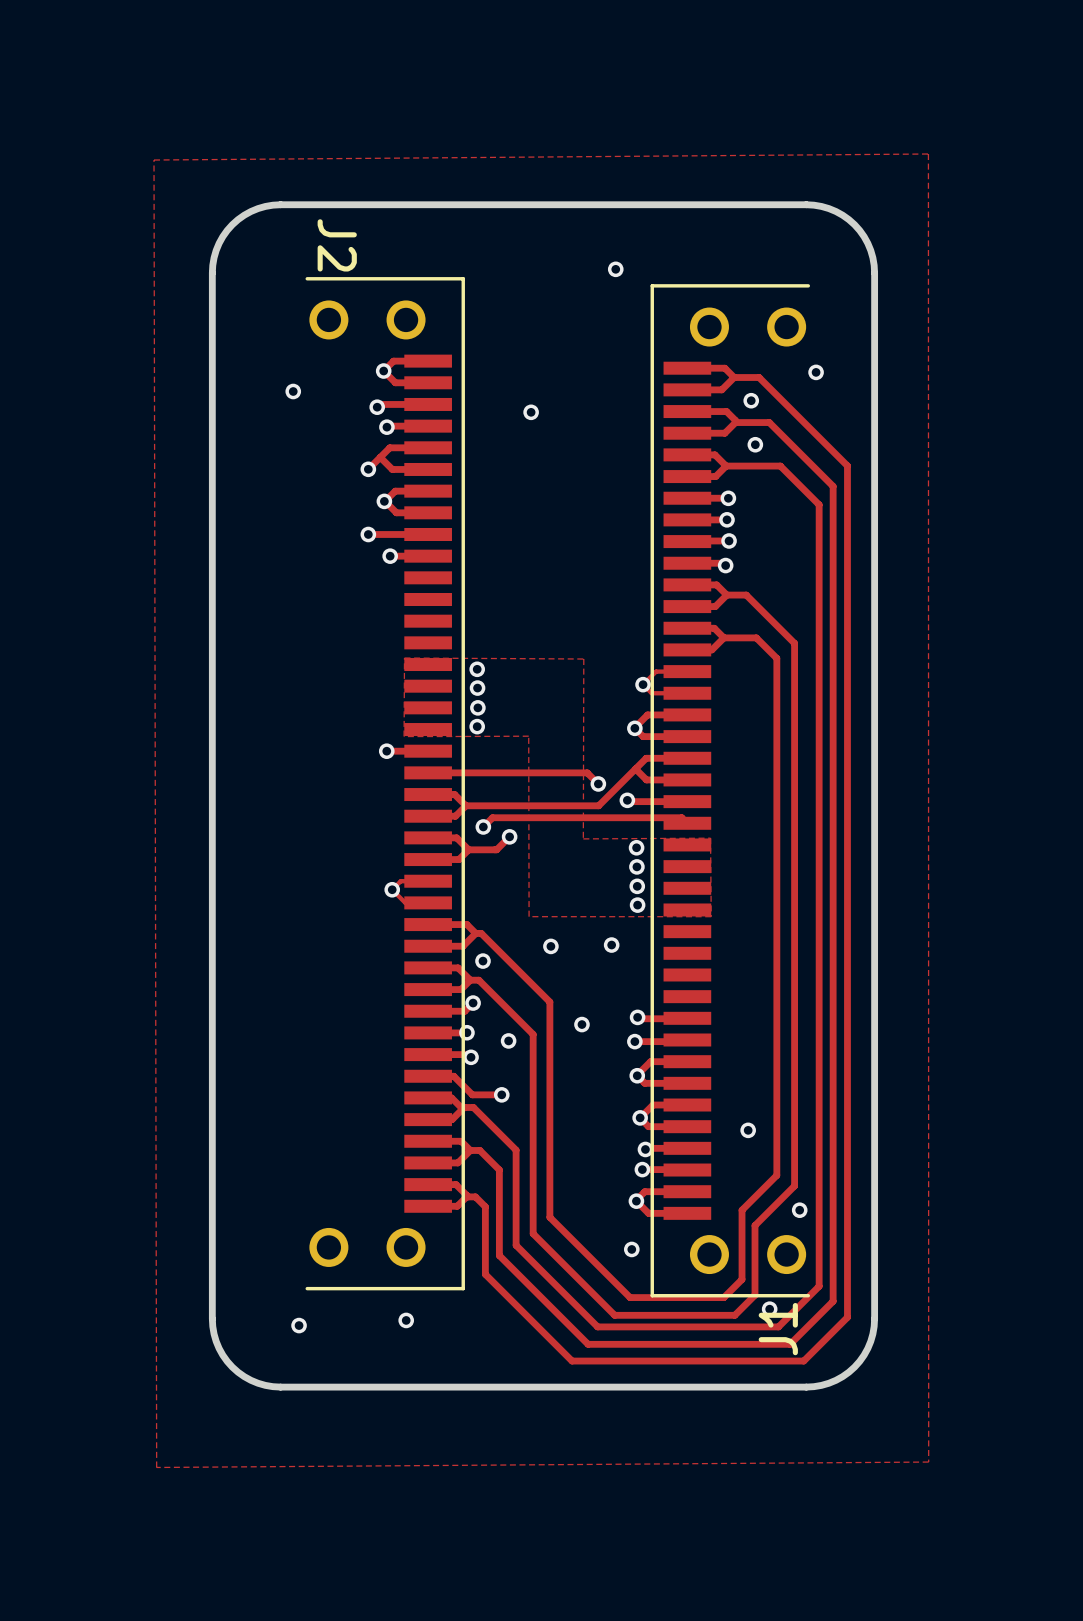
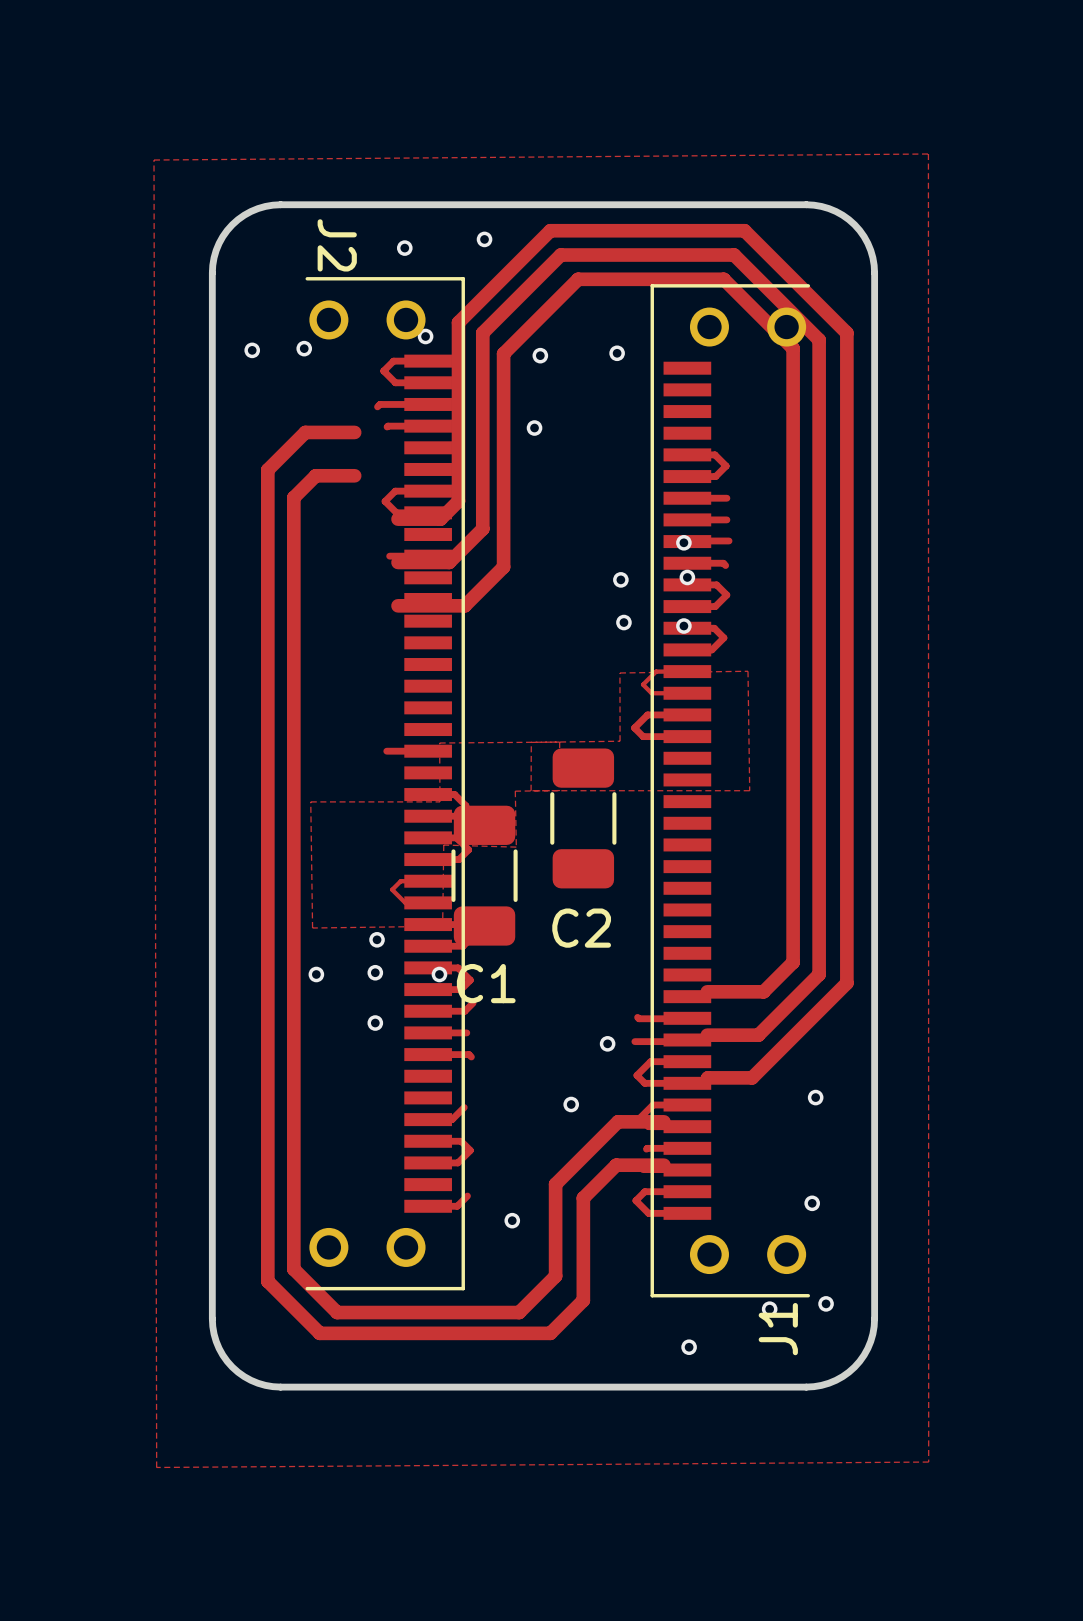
via: none -> (484, 239)
via: none -> (404, 248)
via: (615, 269) -> none
via: none -> (425, 336)
via: none -> (304, 348)
via: none -> (252, 350)
via: none -> (617, 353)
via: none -> (540, 355)
track: (687, 368) (724, 368) (734, 377) -> none
via: (383, 371) -> none
via: (816, 372) -> none
track: (734, 377) (721, 389) (687, 389) -> none
track: (734, 377) (759, 377) (847, 465) (847, 1317) (803, 1361) (572, 1361) (485, 1274) (485, 1206) (475, 1196) (468, 1196) (456, 1184) (428, 1184) -> none
via: (293, 391) -> none
via: (751, 400) -> none
via: (377, 407) -> none
track: (687, 411) (726, 411) (735, 422) -> none
via position: (531, 412) -> (534, 428)
track: (735, 422) (769, 422) (833, 486) (833, 1301) (790, 1344) (588, 1344) (499, 1255) (499, 1169) (479, 1150) (470, 1150) -> none
track: (735, 422) (724, 433) (687, 433) -> none
via: (386, 427) -> none
track: none -> (354, 432) (305, 432) (267, 469) (267, 1281) (319, 1333) (550, 1333) (583, 1300) (583, 1198) (616, 1165) (663, 1165)
via: (755, 444) -> none
track: (428, 447) (389, 447) (368, 469) -> none
track: (380, 457) (392, 469) (428, 469) -> none
track: (726, 466) (780, 466) (819, 504) -> (398, 562) (449, 562) (482, 528) (482, 333) (560, 255) (734, 255) (819, 339) (819, 504)
via: (368, 469) -> none
track: none -> (354, 475) (315, 475) (293, 497) (293, 1269) (337, 1312) (519, 1312) (555, 1276) (555, 1184) (618, 1121) (663, 1121)
via: (728, 498) -> none
via: (384, 501) -> none
track width: thin (819, 504) (819, 1286) -> thick (819, 504) (819, 1286)
track: none -> (398, 519) (440, 519) (458, 501) (458, 322) (550, 230) (744, 230) (846, 333) (846, 983) (752, 1077) (707, 1078)
via: (727, 519) -> none
track: (368, 534) (428, 534) -> none
via: (368, 534) -> none
via: (729, 540) -> none
via: none -> (683, 542)
via: (390, 556) -> none
via: (725, 565) -> none
via: none -> (687, 577)
via: none -> (620, 579)
track: (726, 595) (746, 595) (794, 643) (794, 1185) (754, 1225) (754, 1295) (734, 1315) (614, 1315) (533, 1233) (533, 1034) (478, 980) (470, 980) -> none
track: none -> (398, 605) (464, 605) (503, 567) (503, 353) (578, 279) (723, 279) (793, 348) (793, 962) (763, 991) (707, 991)
via: none -> (623, 622)
via: none -> (683, 626)
track: (723, 637) (756, 637) (776, 658) (776, 1175) (742, 1210) (742, 1279) (723, 1297) (630, 1297) (549, 1217) (549, 1002) (481, 933) (475, 933) -> none
zone outline: (404, 658) (404, 736) (528, 736) (529, 916) (711, 916) (710, 838) (583, 838) (583, 659) (404, 658) -> none
via: (477, 669) -> none
zone outline: none -> (748, 671) (619, 672) (620, 741) (531, 742) (531, 790) (749, 790) (748, 671)
via: (643, 684) -> none
via: (477, 688) -> none
via: (477, 707) -> none
via: (477, 726) -> none
via: (634, 728) -> none
zone outline: none -> (559, 742) (439, 743) (440, 801) (310, 801) (312, 928) (442, 926) (443, 845) (516, 847) (515, 791) (559, 790) (559, 742)
via: (386, 751) -> none
track: (687, 758) (646, 758) (598, 805) (465, 805) -> none
track: (635, 768) (646, 779) (687, 779) -> none
track: (428, 772) (587, 772) (598, 783) -> none
via: (598, 783) -> none
track: (627, 800) (687, 801) -> none
via: (627, 800) -> none
C2: none -> (583, 818)
track: (687, 823) (681, 817) (492, 817) (483, 826) -> none
via: (483, 826) -> none
track: (509, 836) (496, 849) (468, 849) -> none
via: (509, 836) -> none
via: (636, 847) -> none
via: (636, 866) -> none
C1: none -> (484, 875)
via: (637, 886) -> none
via: (392, 889) -> none
via: (637, 905) -> none
via: none -> (377, 939)
via: (611, 945) -> none
via: (550, 946) -> none
via: (483, 961) -> none
via: none -> (375, 972)
via: none -> (316, 974)
via: none -> (439, 974)
track: (819, 974) (819, 1286) (778, 1326) (597, 1326) (516, 1245) (516, 1150) (473, 1107) (461, 1107) (451, 1097) (428, 1097) -> (819, 974) (758, 1035) (707, 1035)
via: (473, 1003) -> none
via: (637, 1017) -> none
via: none -> (375, 1023)
via: (581, 1024) -> none
via: (466, 1032) -> none
via: (508, 1040) -> none
via: (634, 1041) -> none
via: none -> (607, 1043)
via: (471, 1057) -> none
via: (637, 1075) -> none
track: (428, 1076) (453, 1076) (472, 1094) (501, 1094) -> none
via: (501, 1094) -> none
via: none -> (815, 1097)
via: none -> (571, 1104)
via: (640, 1117) -> none
via: (748, 1130) -> none
via: (645, 1149) -> none
via: (642, 1169) -> none
via: (636, 1201) -> none
via position: (799, 1210) -> (812, 1203)
via: none -> (512, 1220)
via: (631, 1249) -> none
via: none -> (826, 1303)
via: (406, 1320) -> none
via: (299, 1325) -> none
via: none -> (689, 1347)

